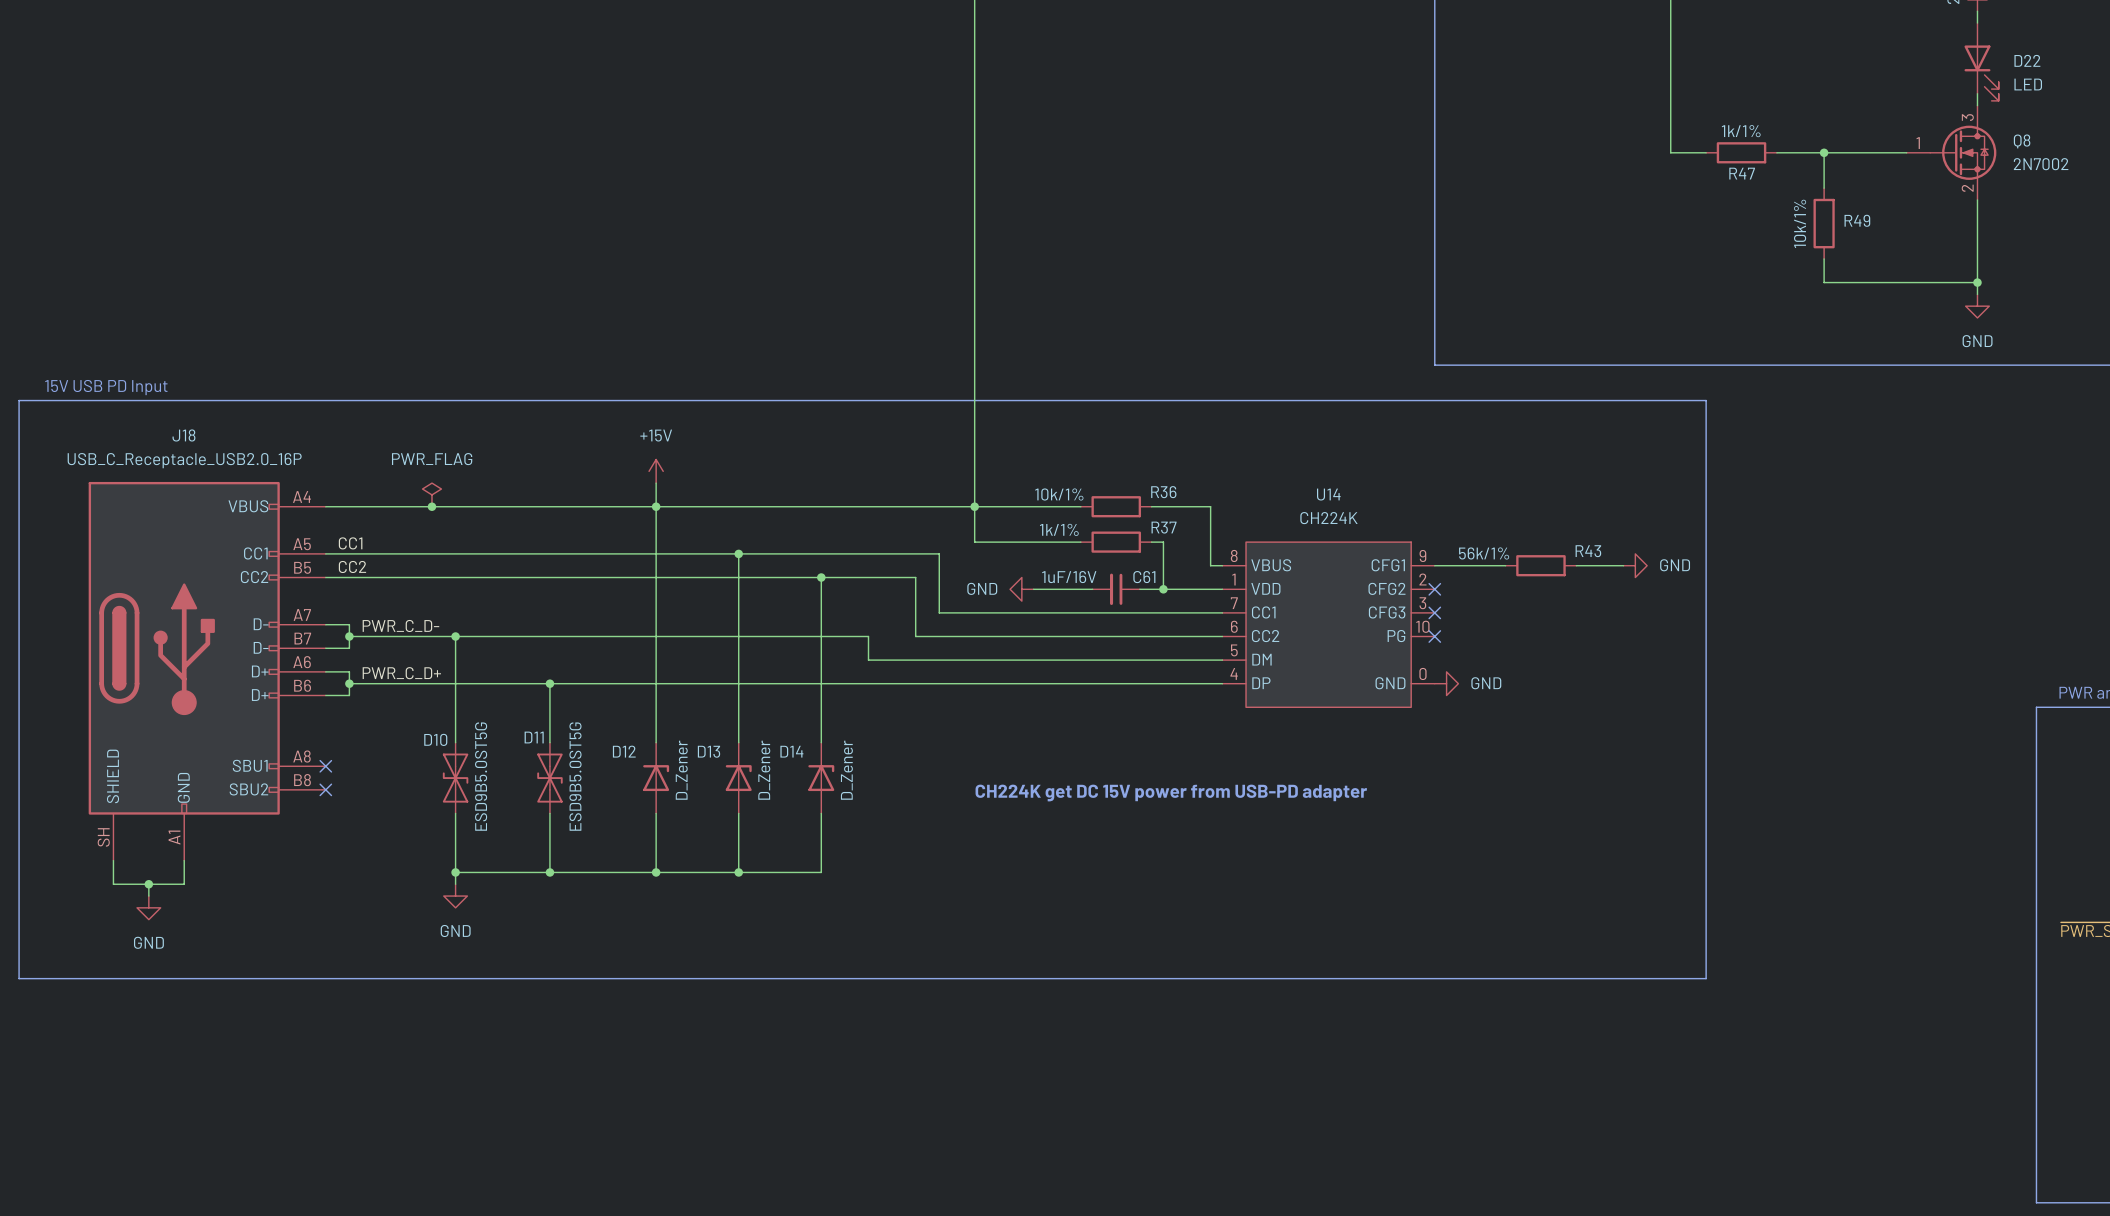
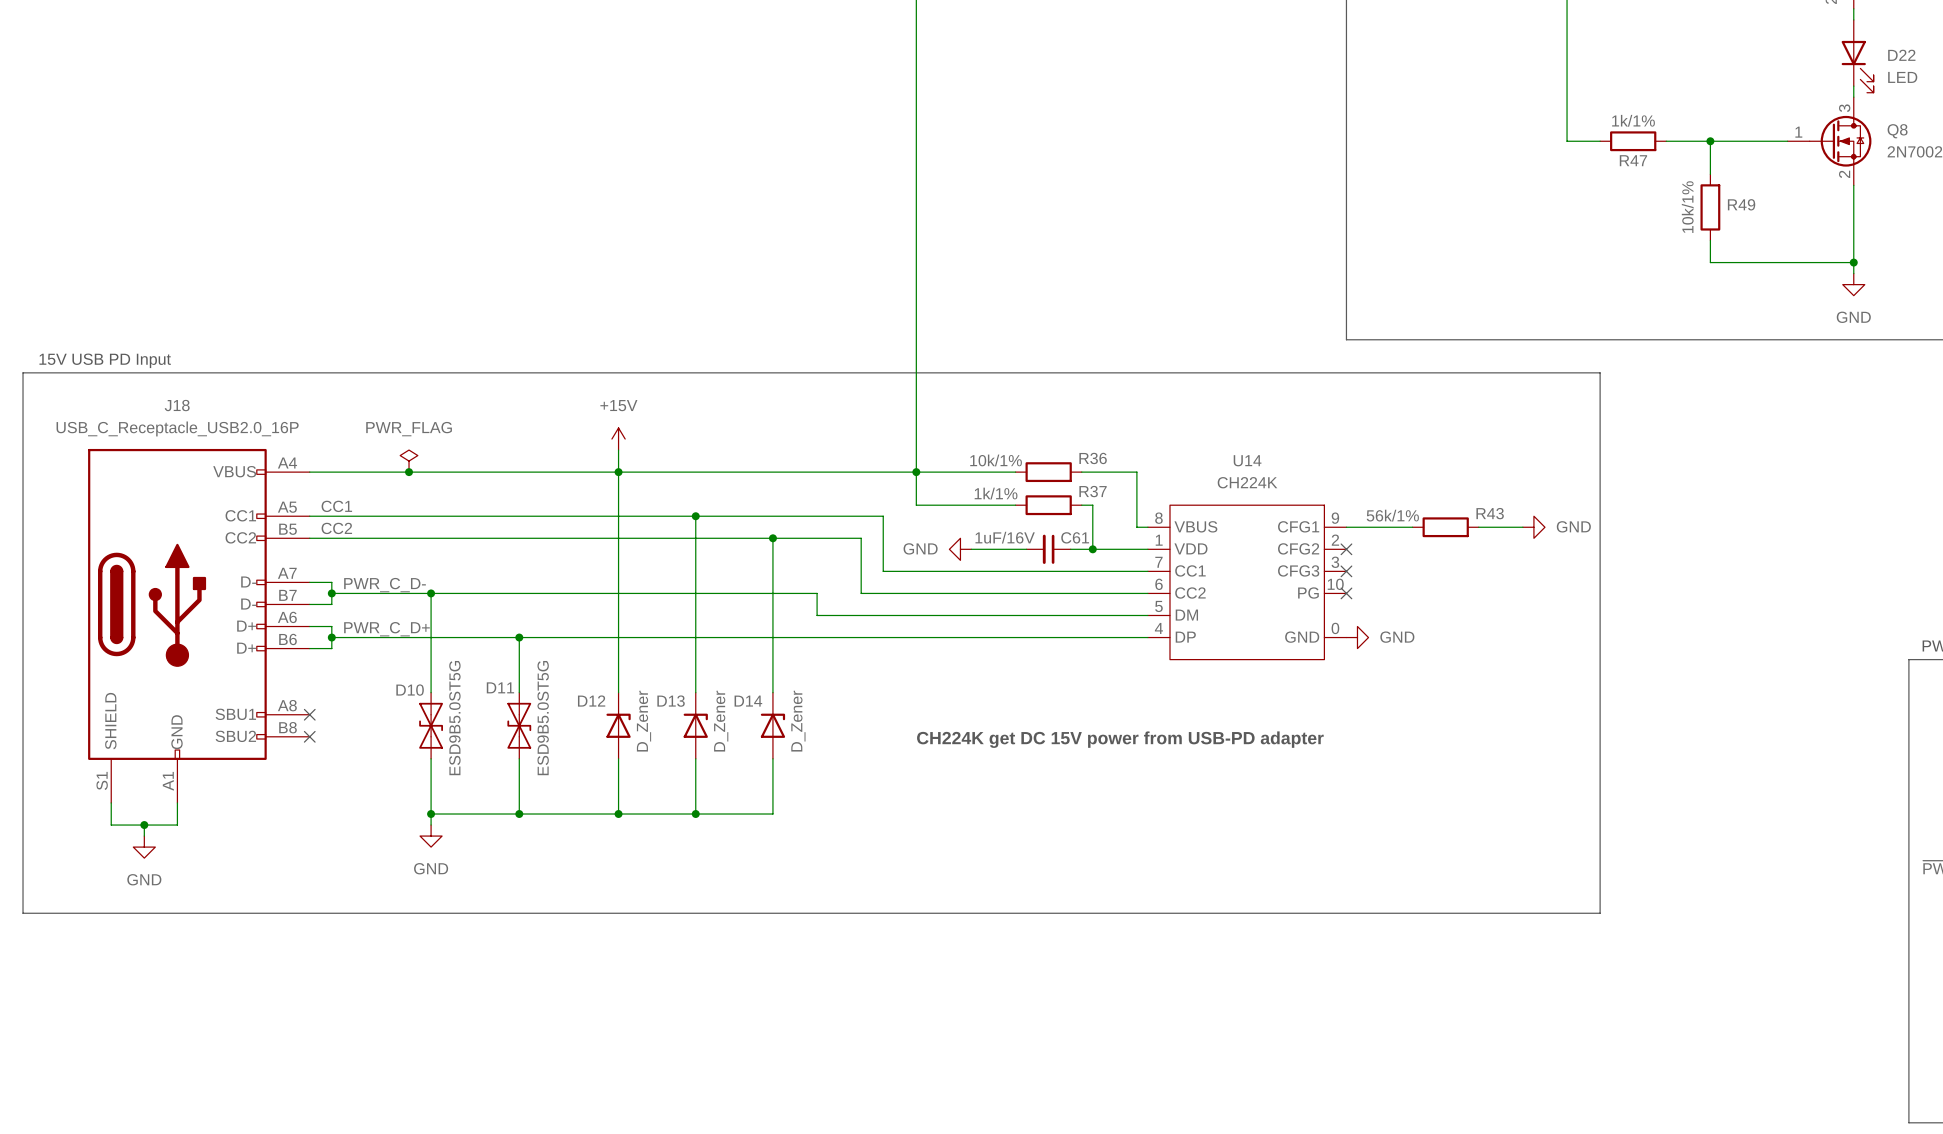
J18 pin number: SH (103, 837) -> S1 (102, 780)

